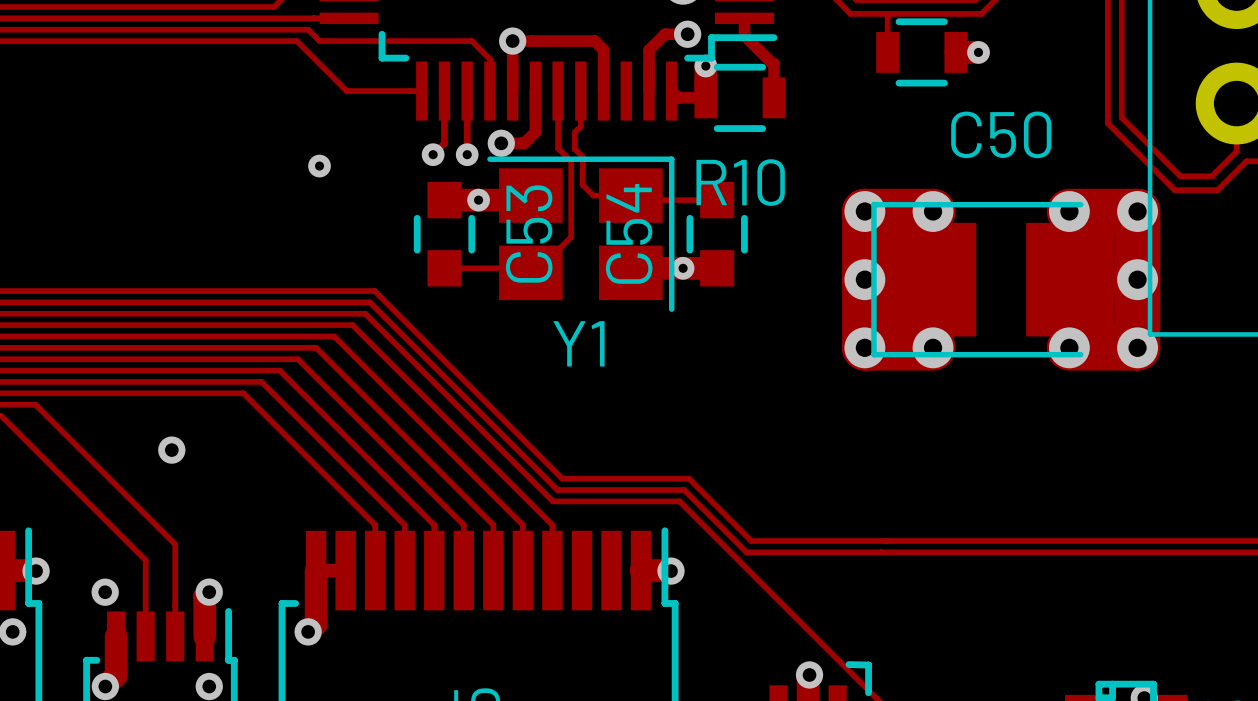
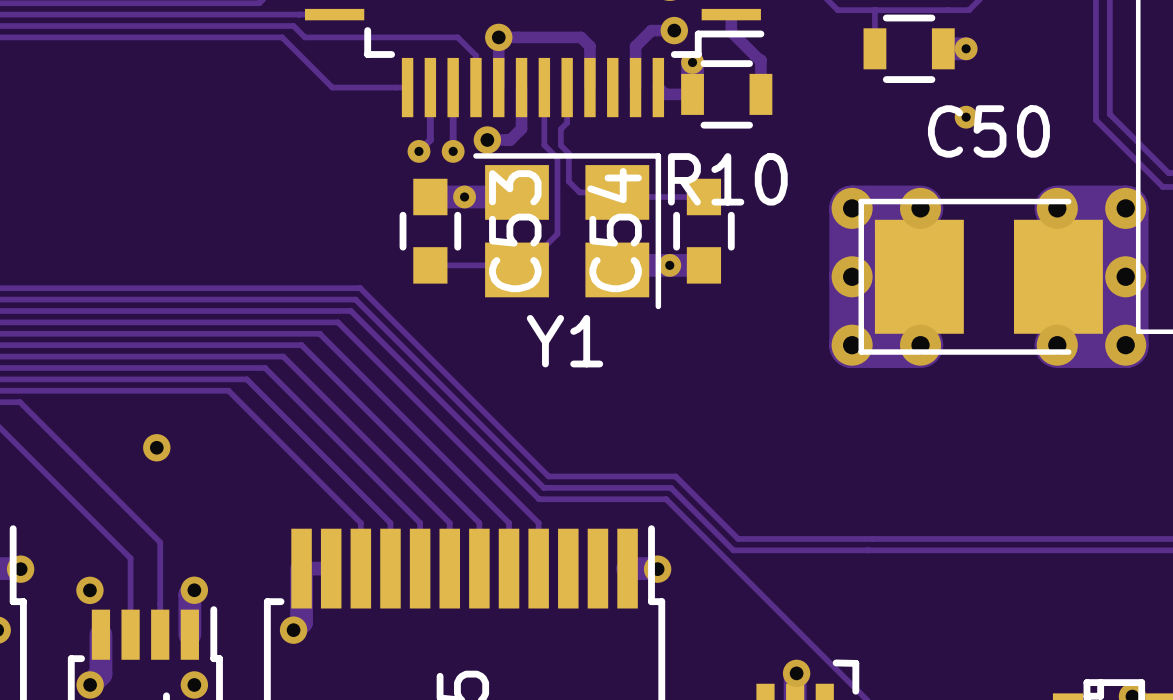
via: none -> (966, 117)
via: (319, 166) -> none

